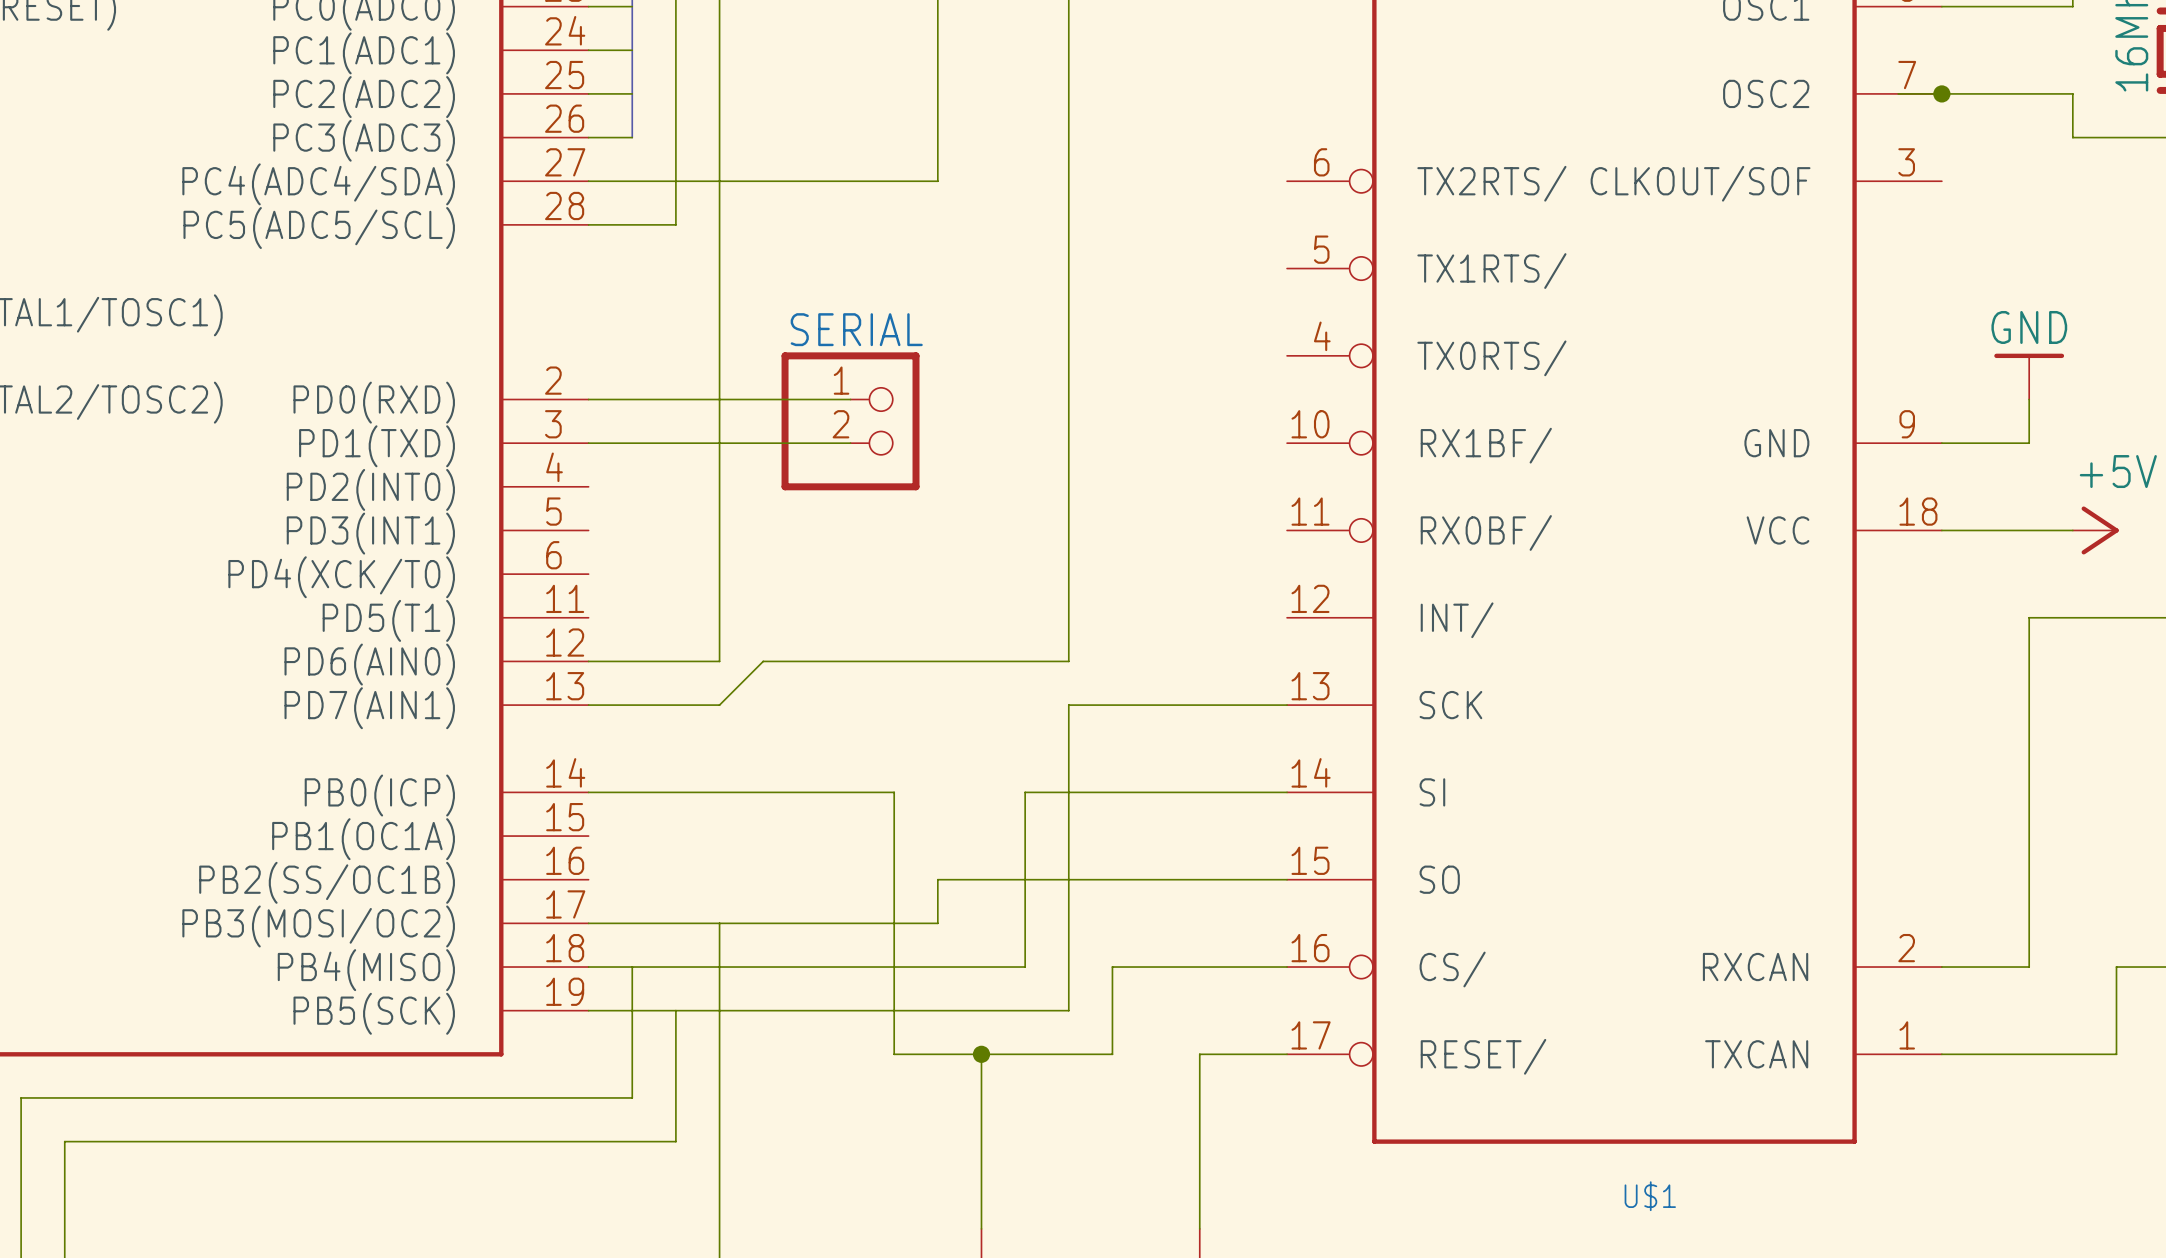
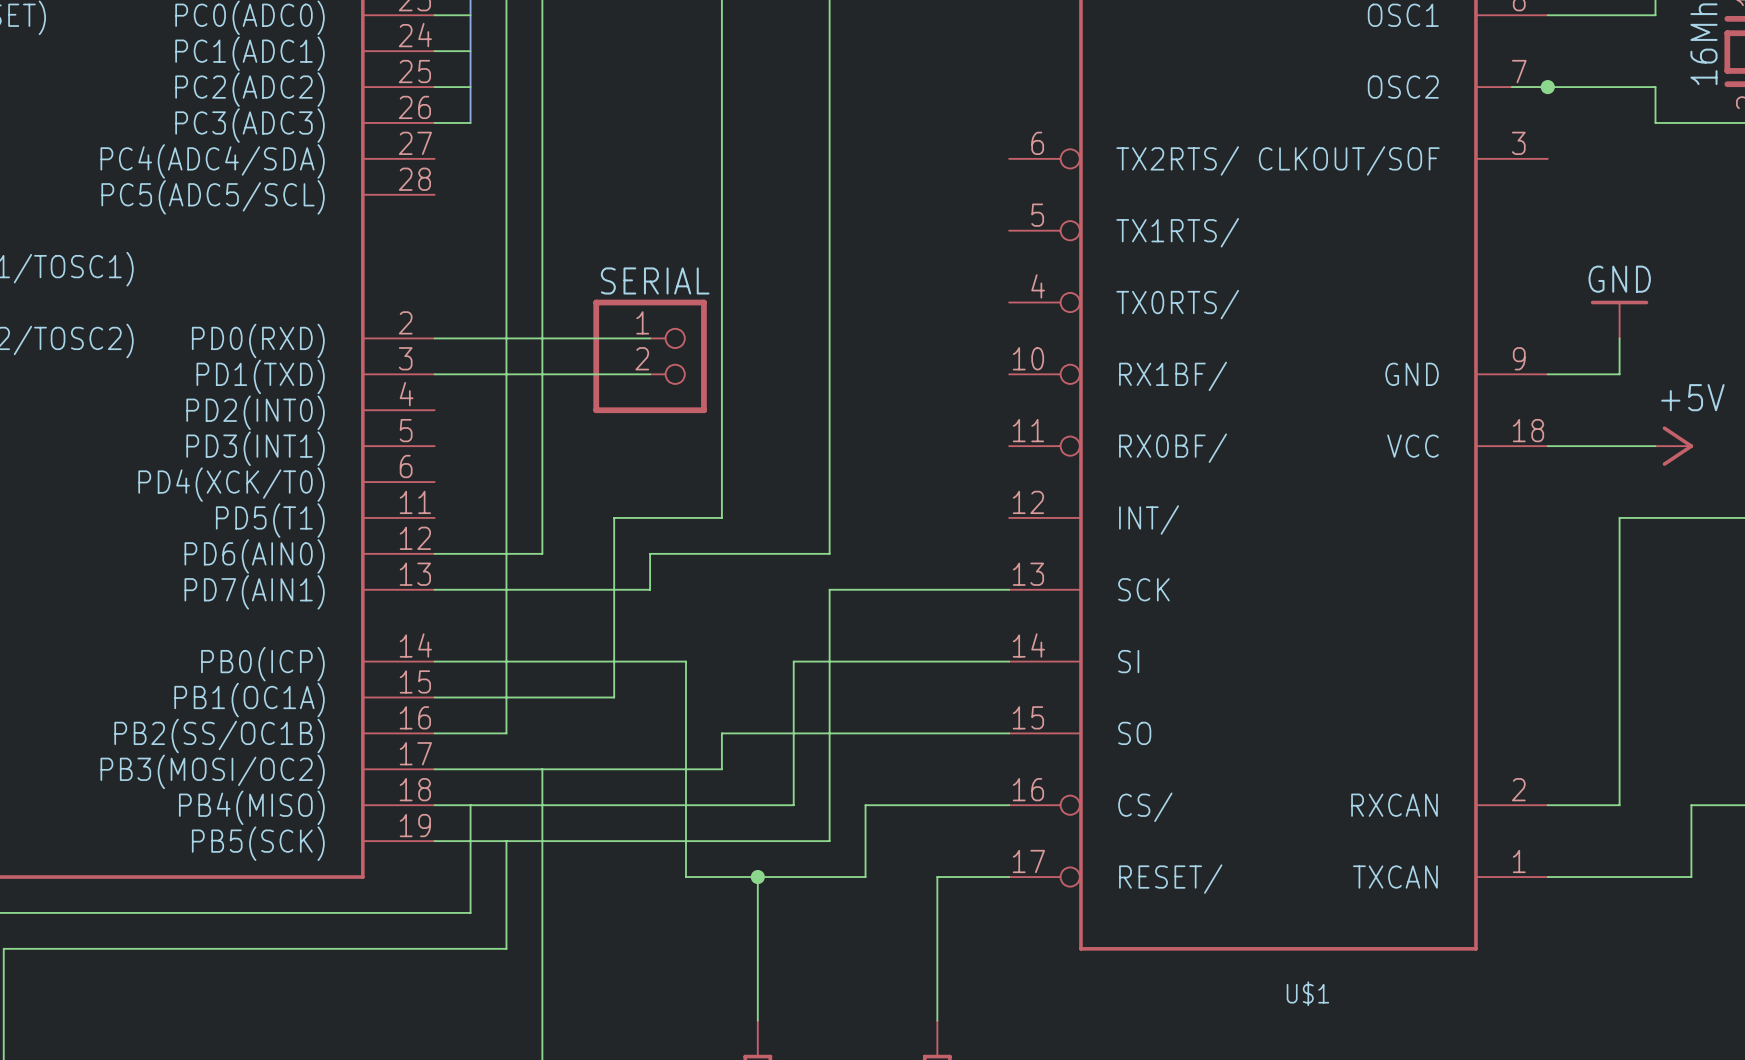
wire: (588, 181) (937, 181) -> (434, 697) (614, 697) (614, 517) (721, 517) (721, 158)
wire: (588, 224) (675, 224) -> (434, 733) (506, 733) (506, 194)
wire: (850, 661) (763, 661) (719, 705) -> (650, 553) (650, 589) (542, 589)

